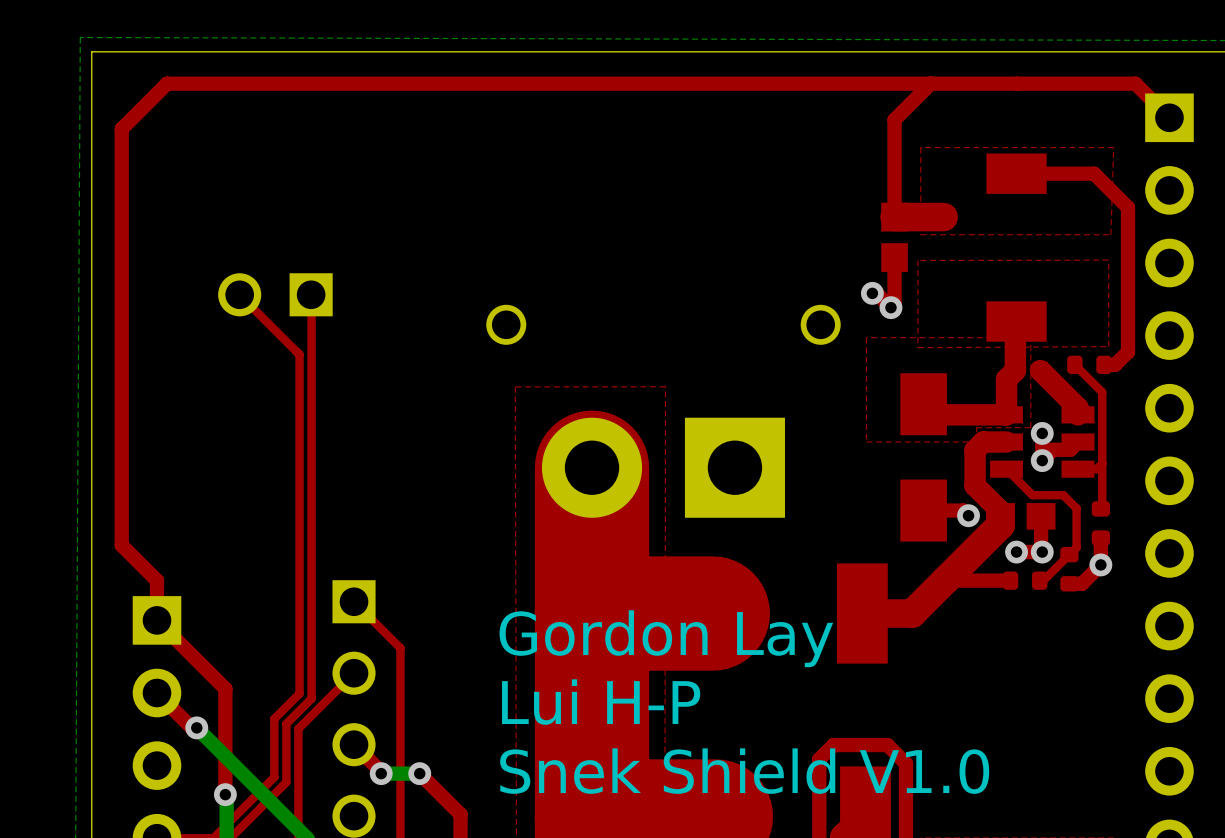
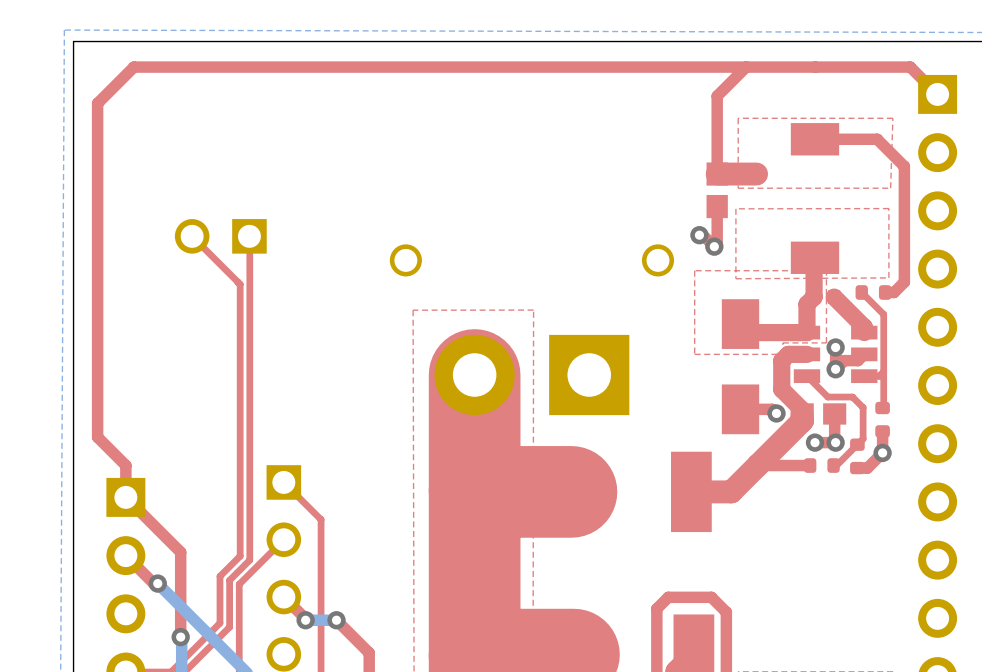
text: Gordon Lay (666, 638) -> none
text: Lui H-P (601, 702) -> none
text: Snek Shield V1.0 (744, 771) -> none

